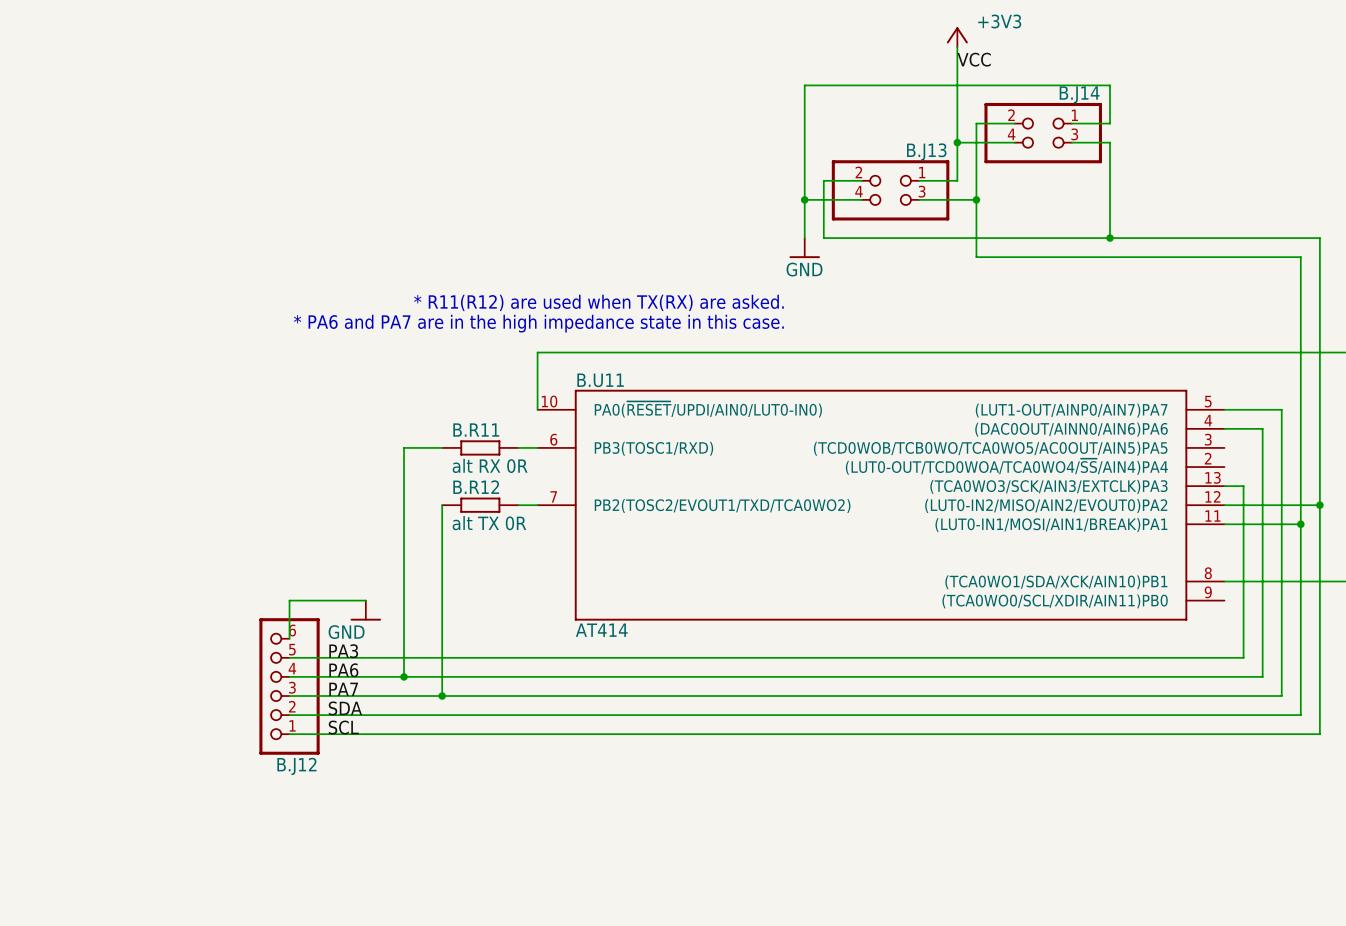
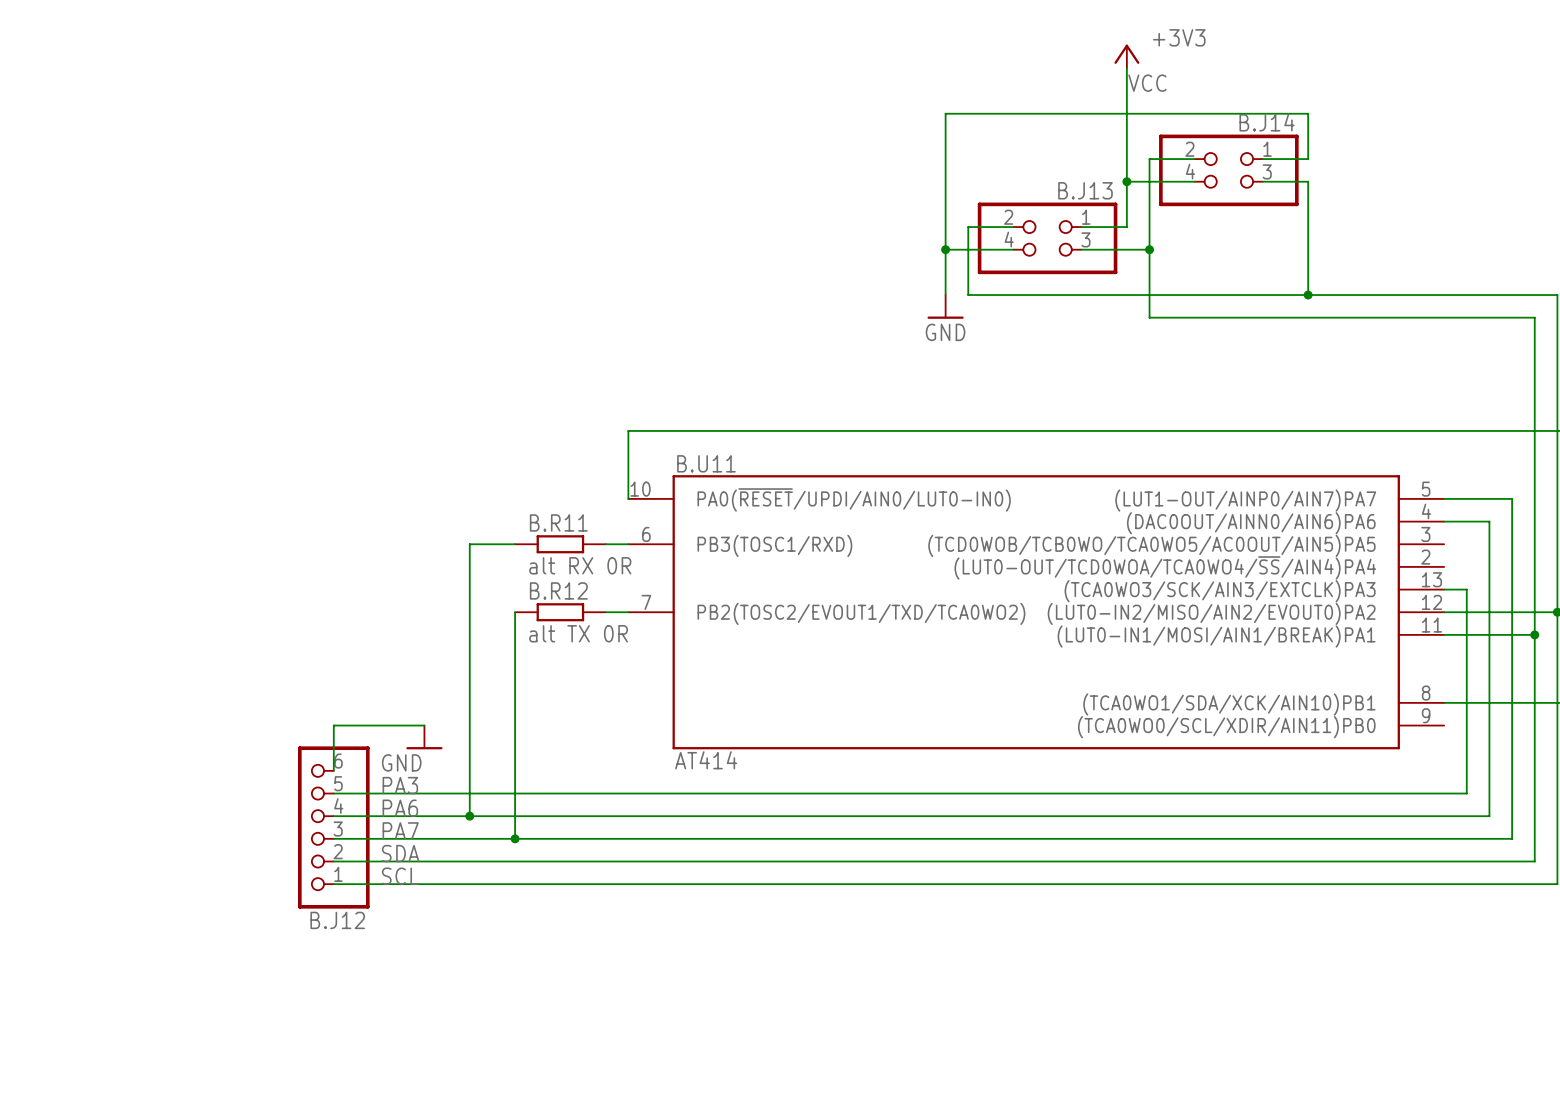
text: * R11(R12) are used when TX(RX) are asked. (598, 302) -> none
text: * PA6 and PA7 are in the high impedance state in this case. (538, 323) -> none

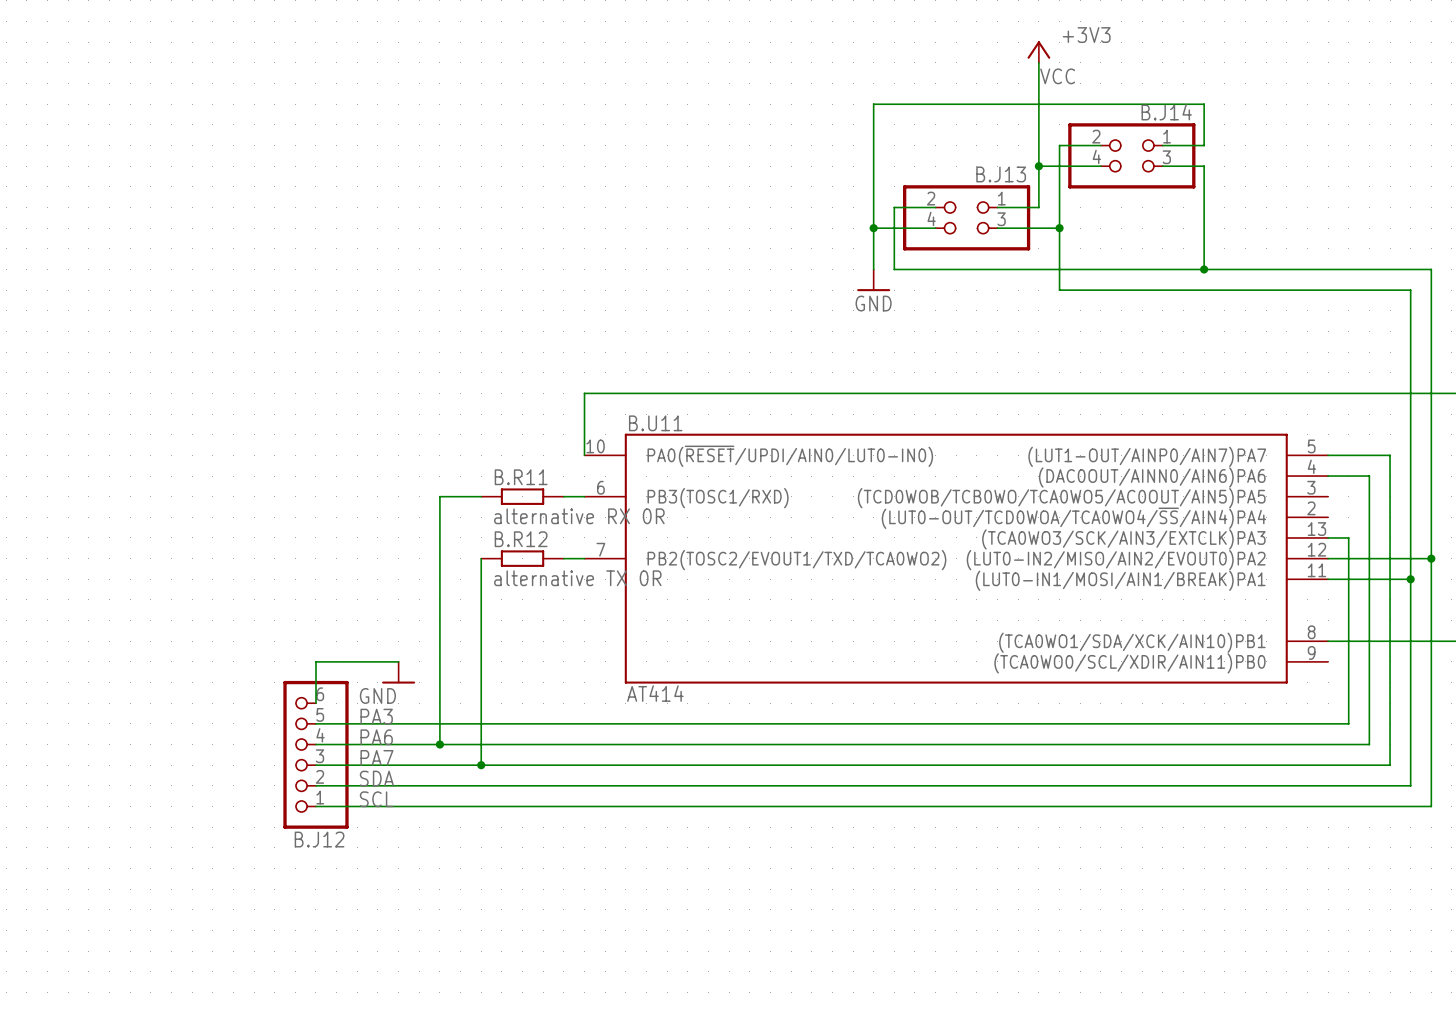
B.R11 value: alt RX 0R (580, 565) -> alternative RX 0R (579, 516)
B.R12 value: alt TX 0R (578, 633) -> alternative TX 0R (577, 578)

